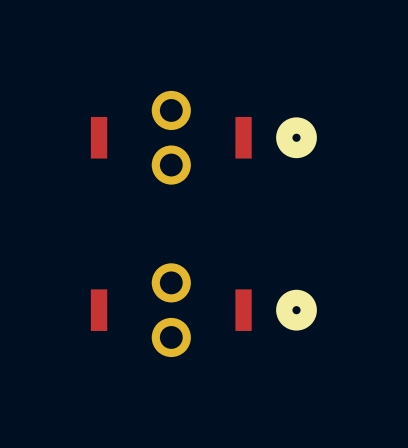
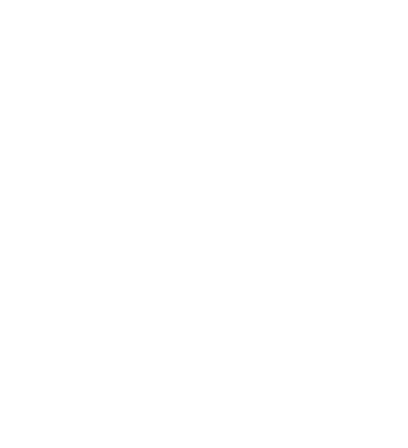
part: (203, 137) -> none
part: (203, 310) -> none

